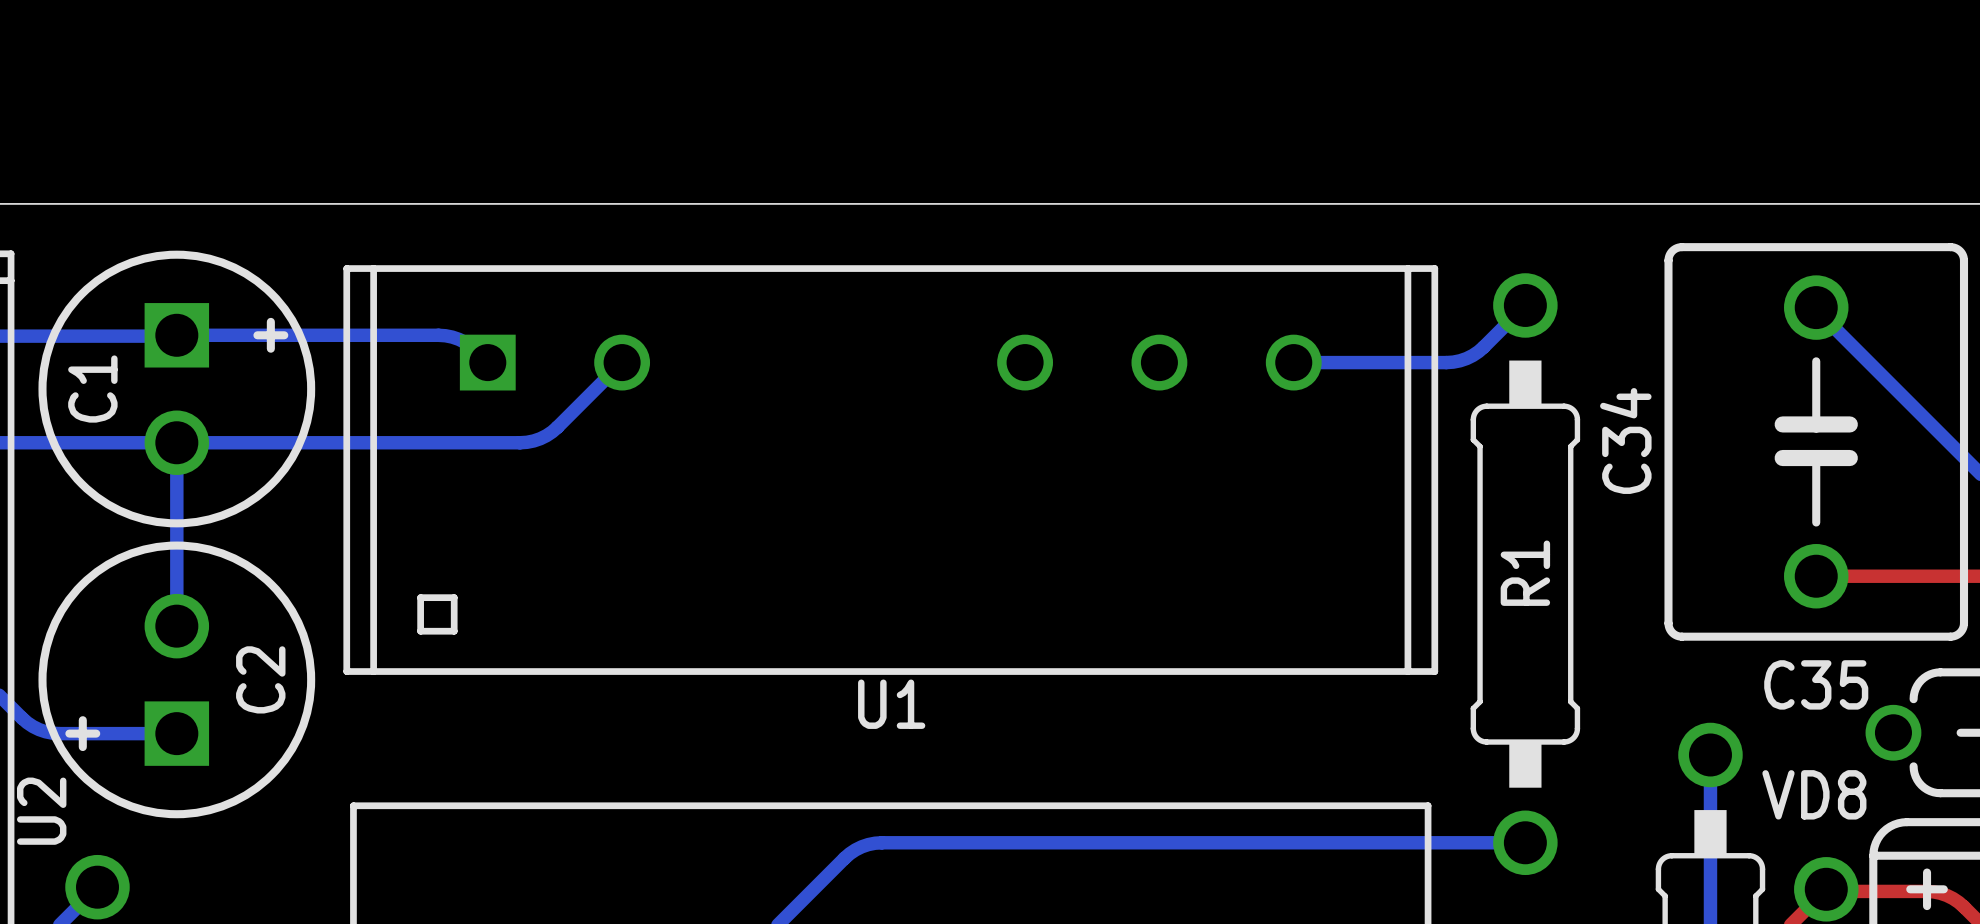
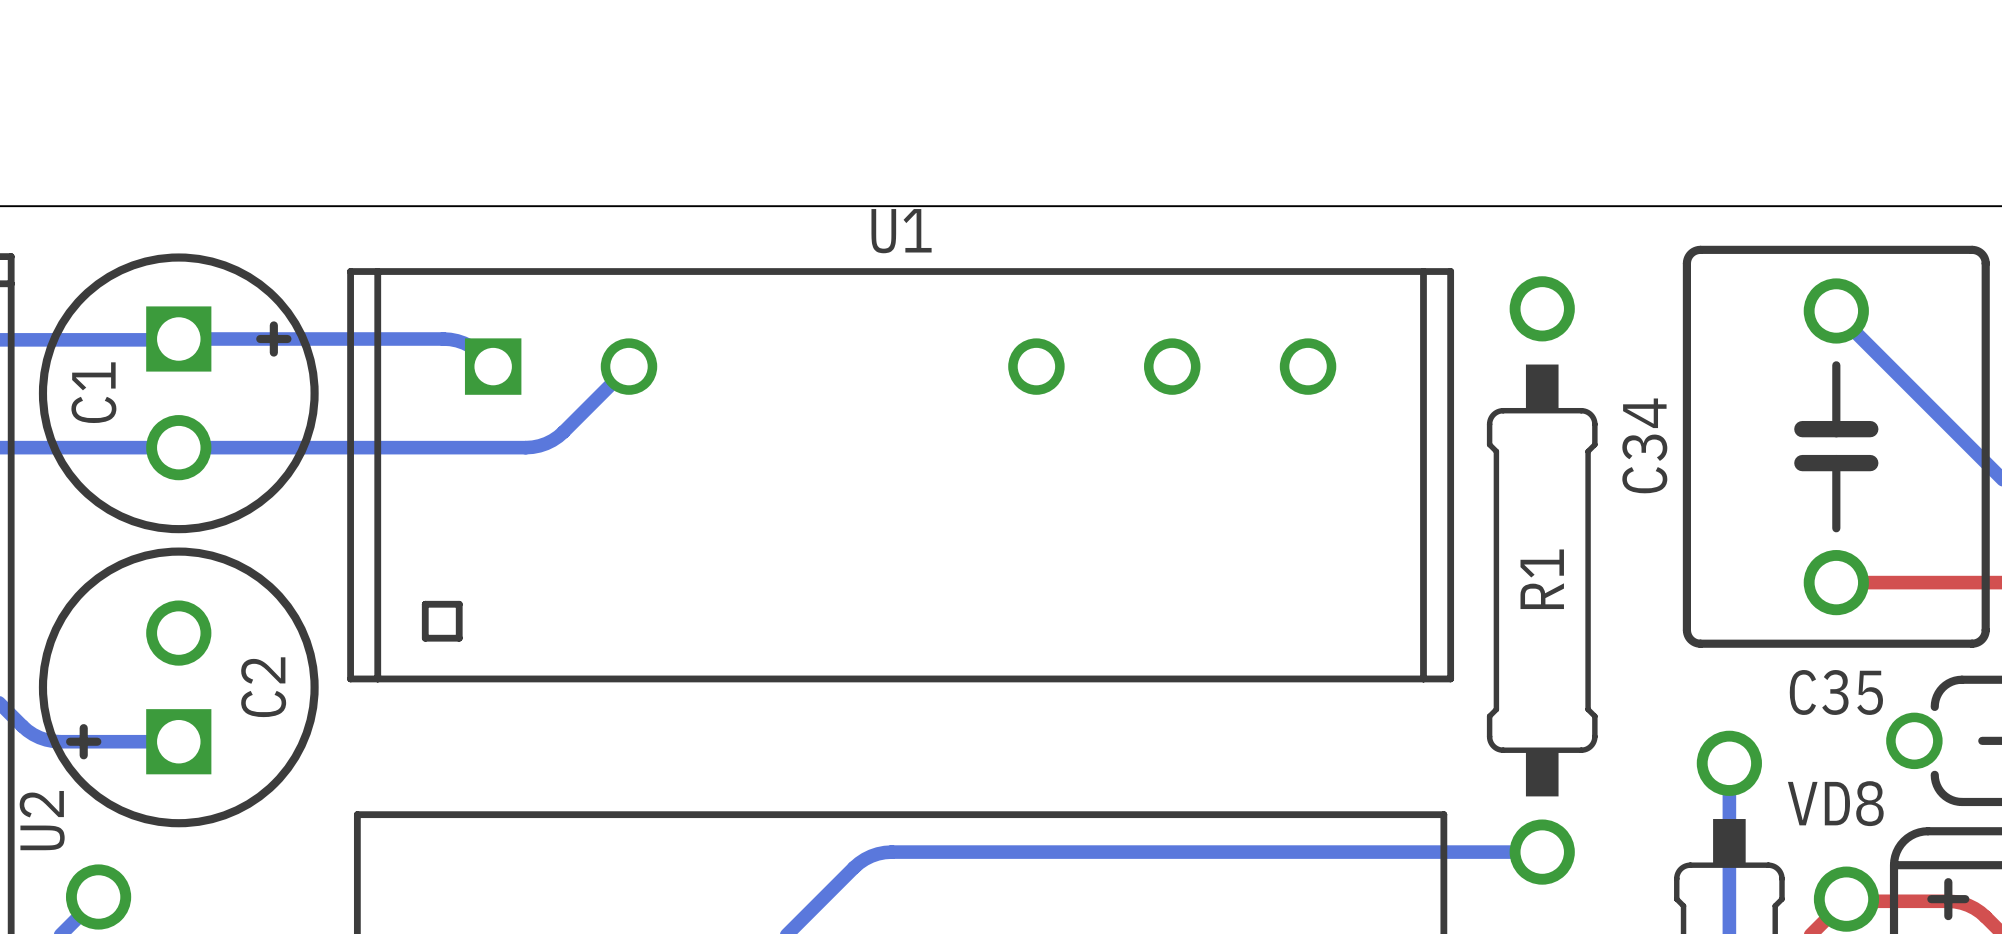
bottom track: (1525, 305) (1478, 351) (1460, 360) (1446, 362) (1293, 362) -> none
bottom track: (176, 442) (176, 626) -> none
U1 name position: U1 (891, 704) -> U1 (901, 231)

